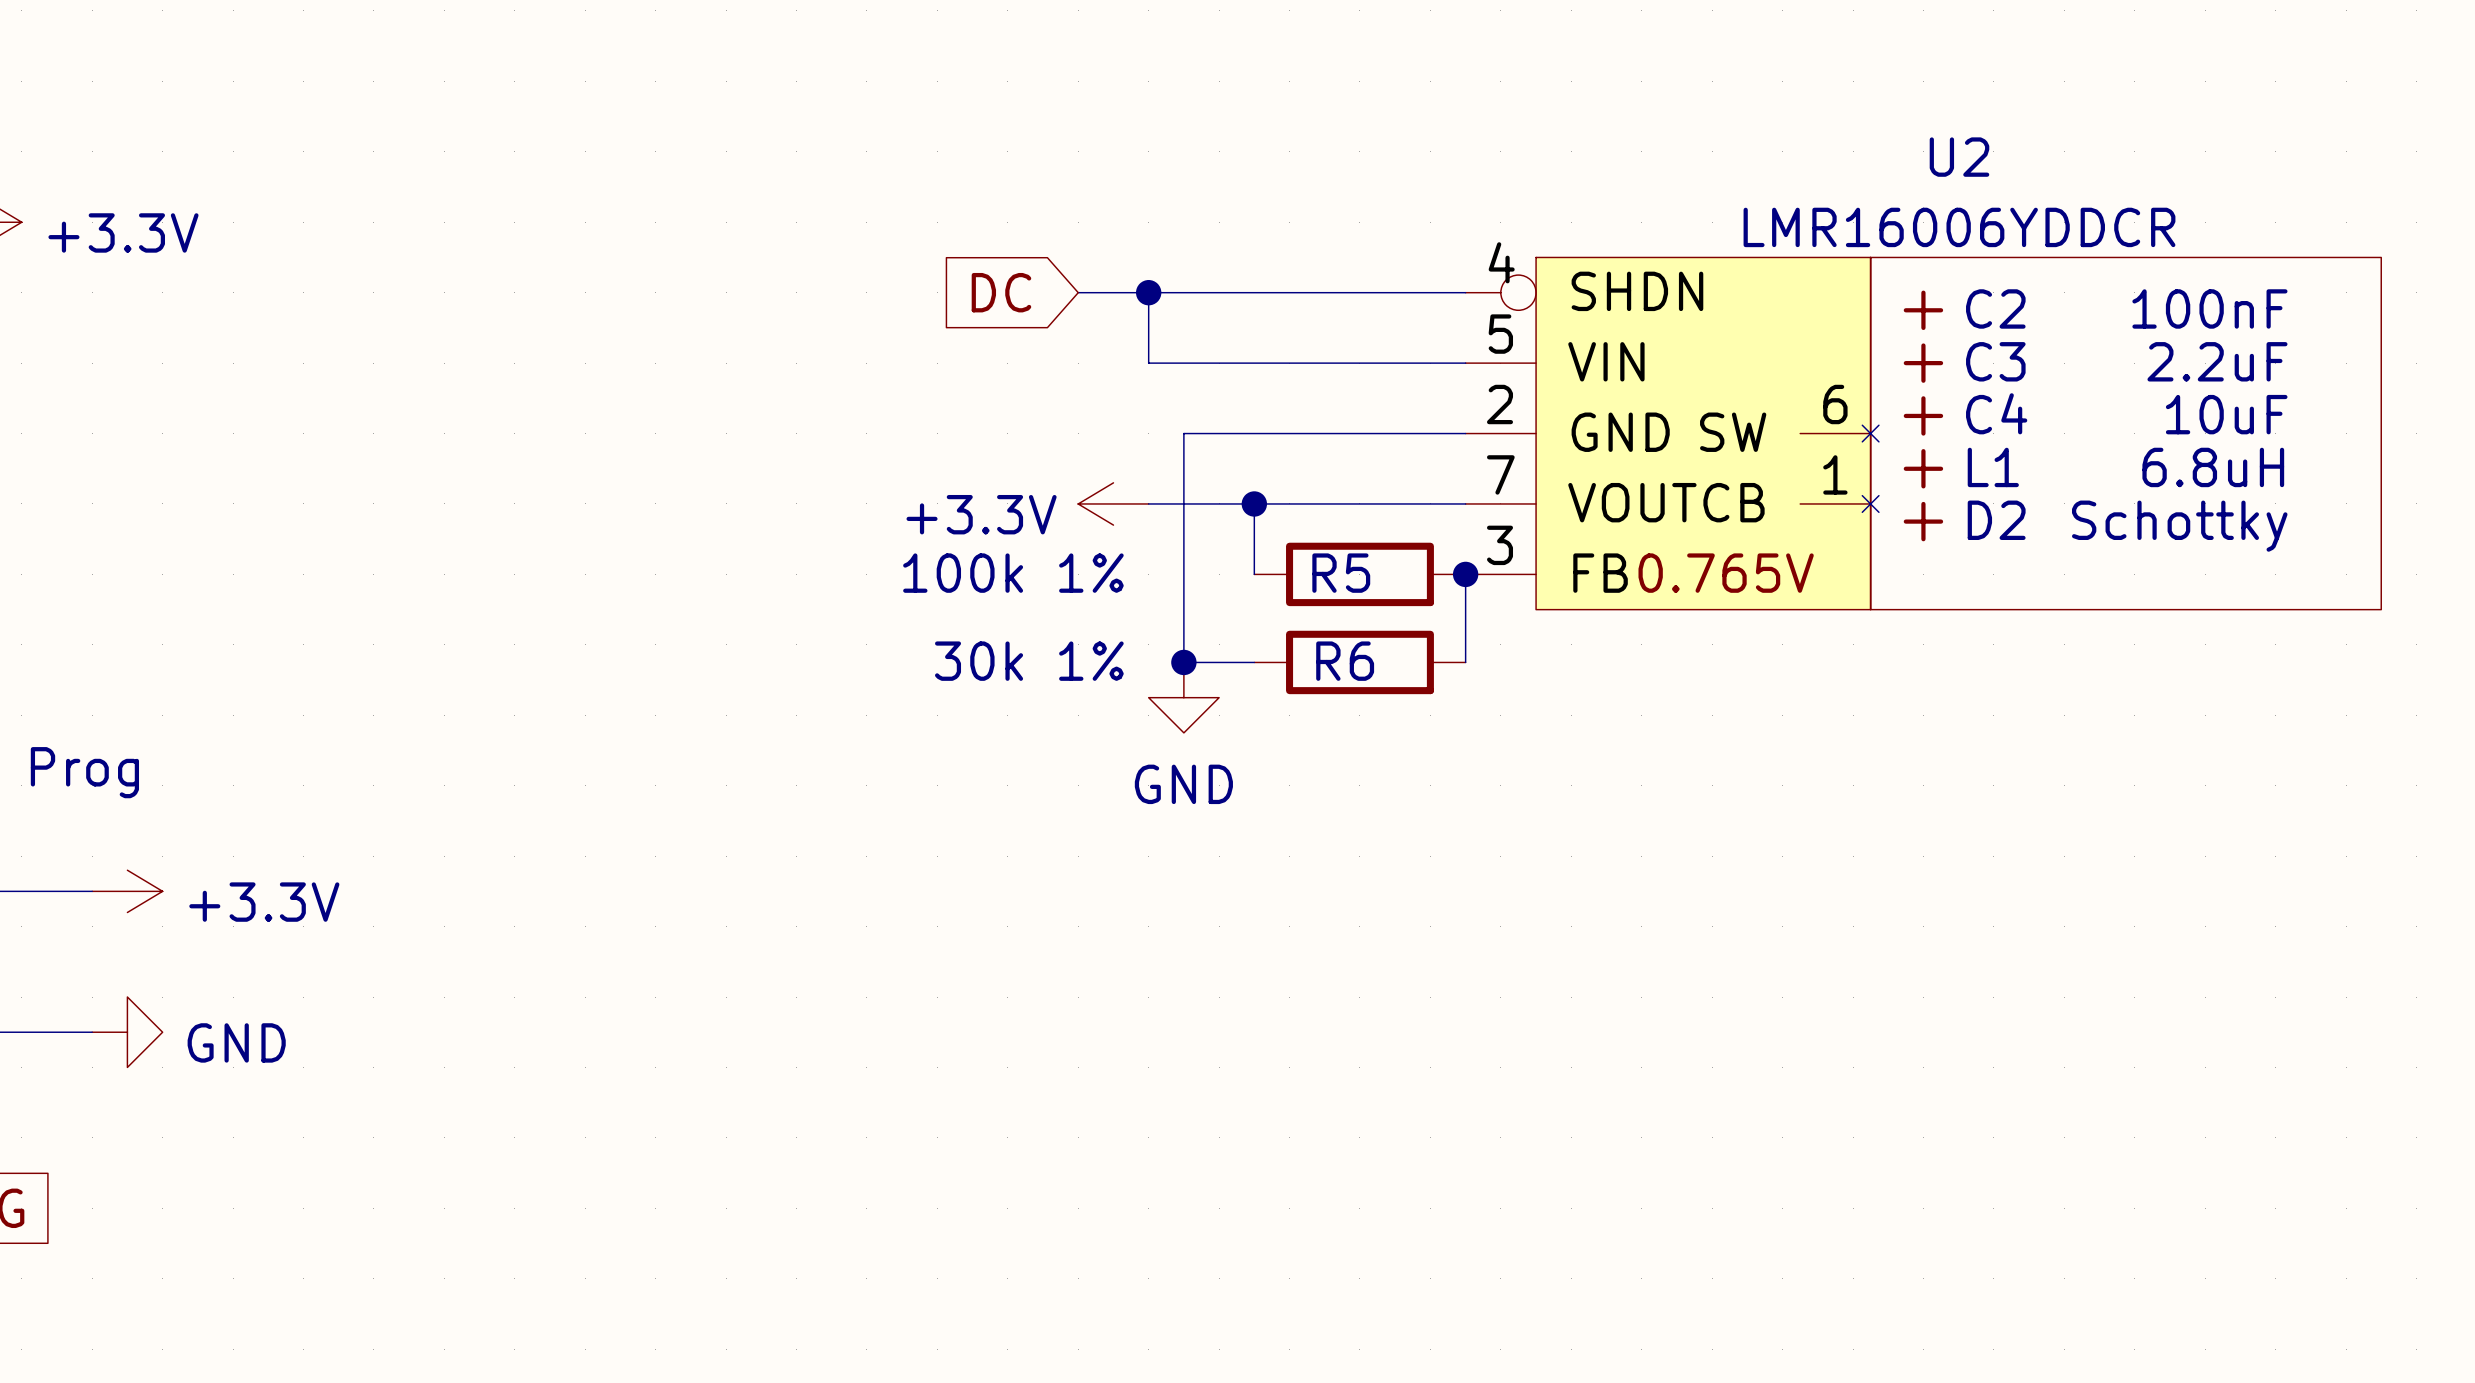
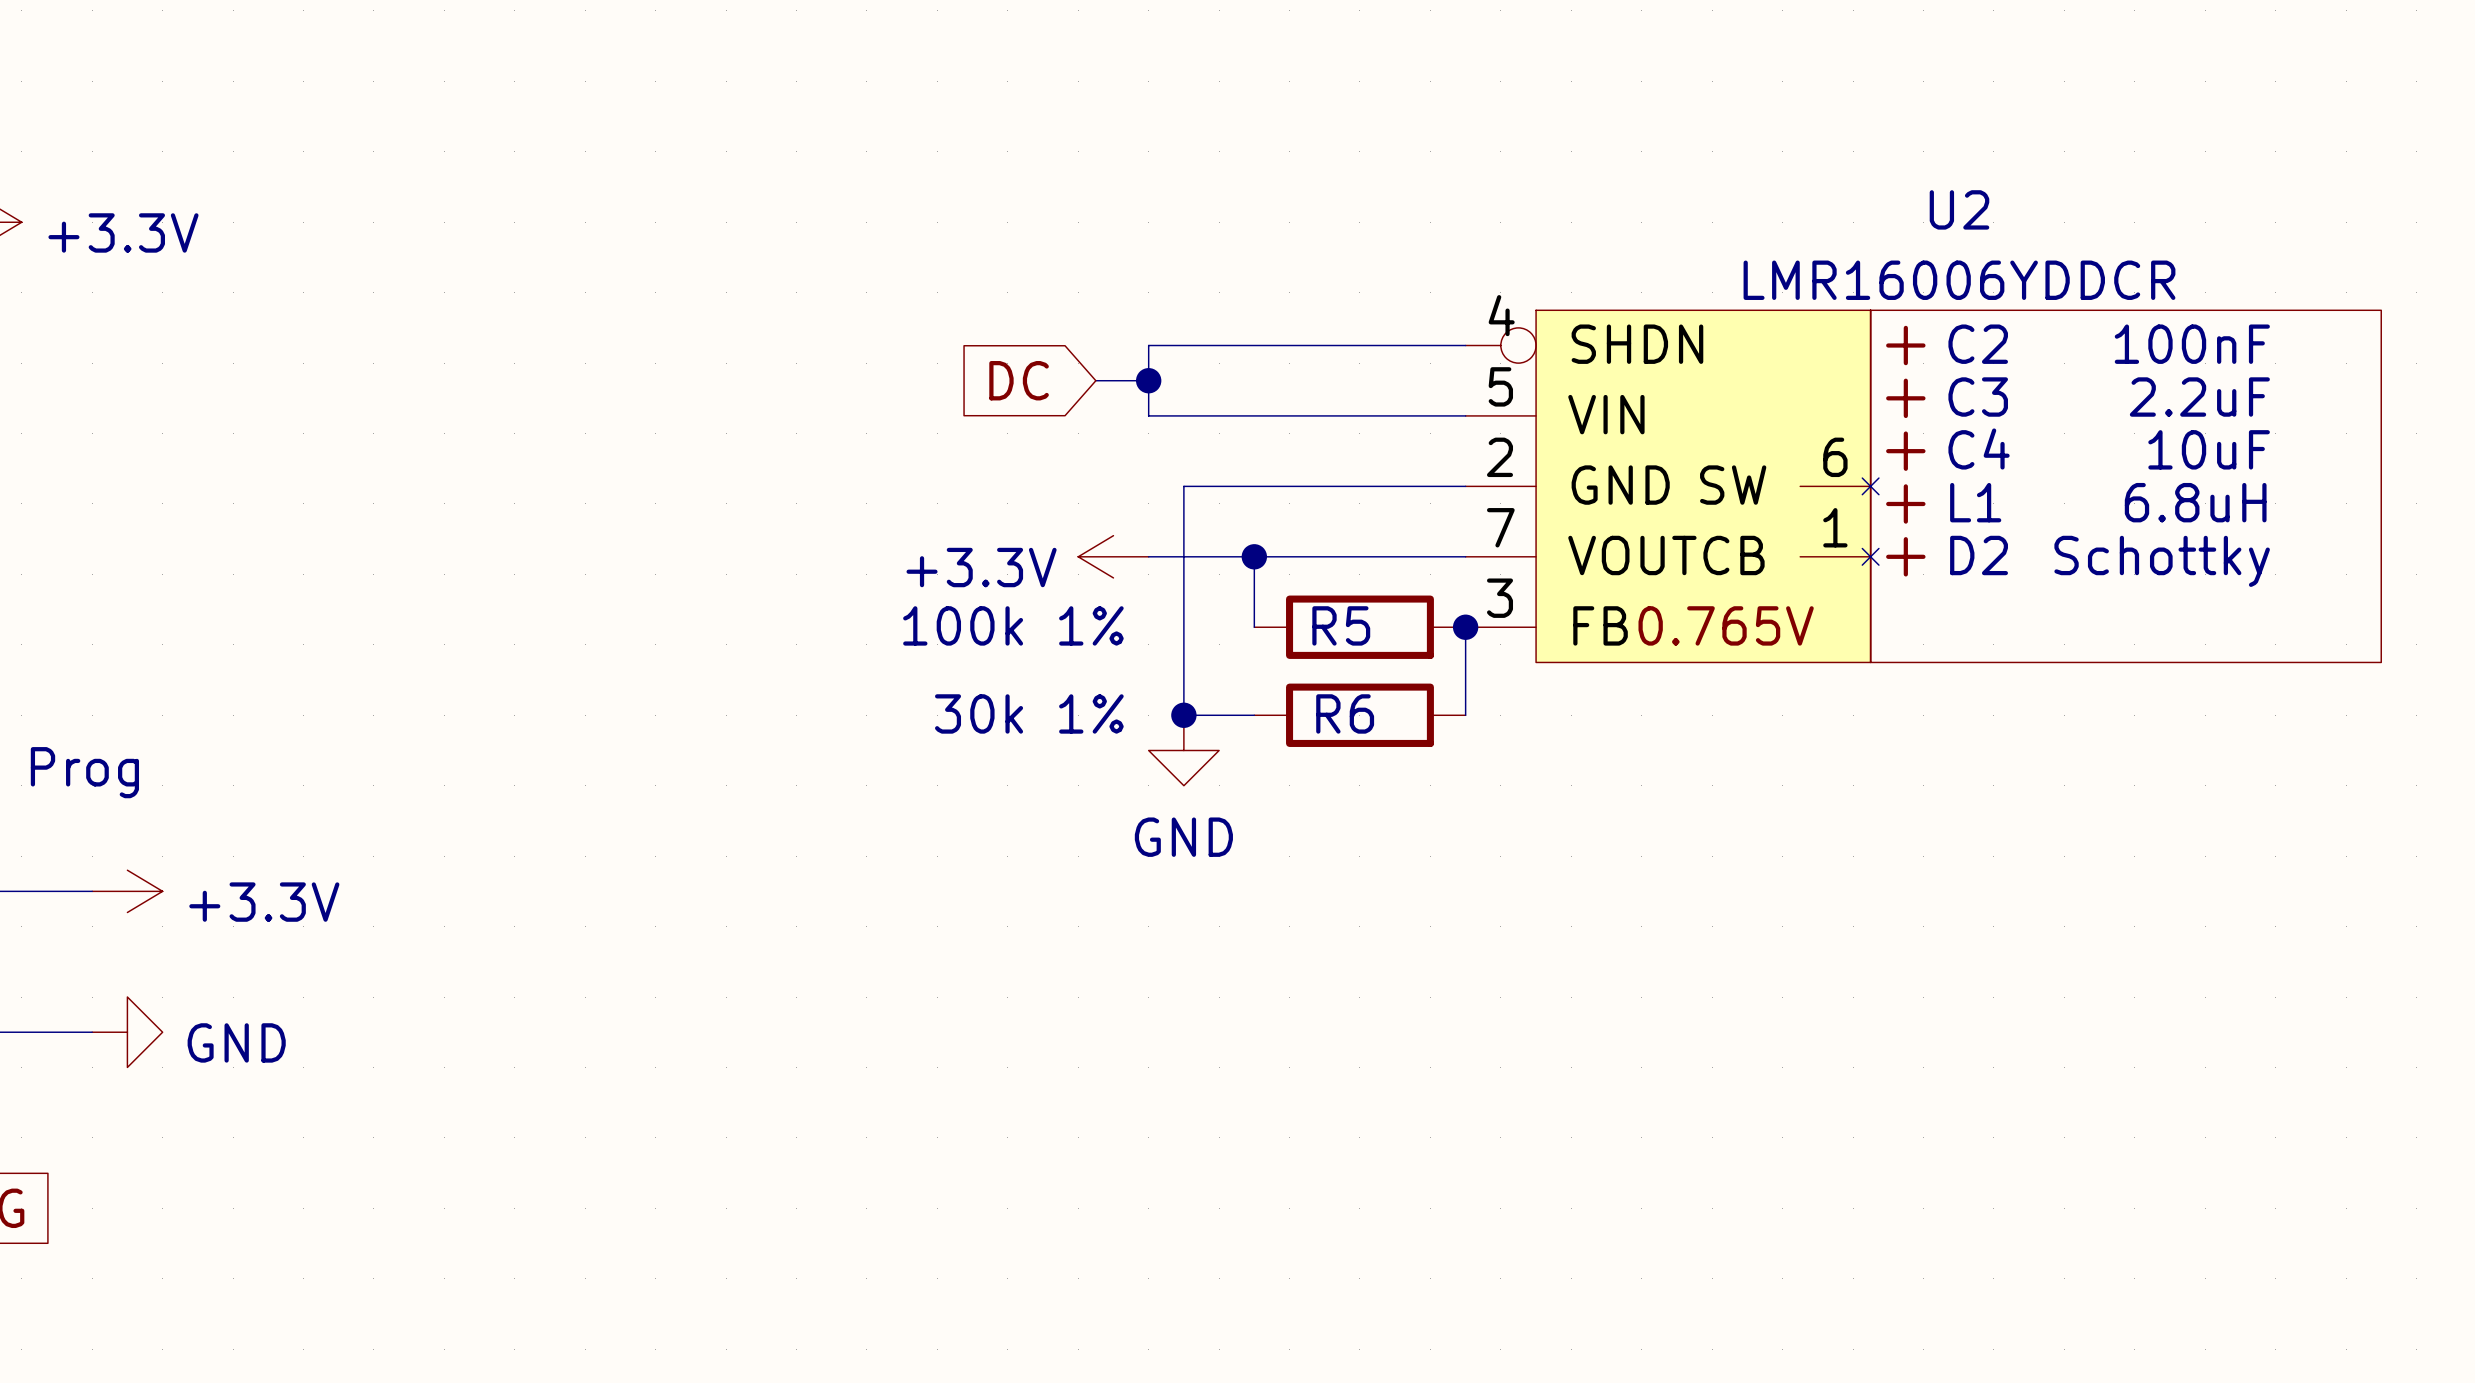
global label position: DC (1001, 292) -> DC (1019, 380)
wire: (1078, 292) (1465, 292) -> none
wire: (1148, 292) (1148, 345) -> (1465, 345) (1148, 345)
junction: (1148, 292) -> none
C2 position: (1923, 310) -> (1905, 345)
wire: (1148, 363) (1465, 363) -> (1148, 363) (1148, 415) (1465, 415)
C3 position: (1923, 363) -> (1905, 398)
wire: none -> (1095, 380) (1148, 380)
junction: none -> (1148, 380)
C4 position: (1923, 415) -> (1905, 451)
wire: (1465, 433) (1183, 433) (1183, 486) -> (1465, 486) (1183, 486)
U2 position: (1923, 433) -> (1923, 486)
L1 position: (1923, 468) -> (1905, 503)
power symbol position: +3.3V (1113, 503) -> +3.3V (1113, 556)
wire: (1148, 503) (1465, 503) -> (1148, 556) (1465, 556)
wire: (1254, 503) (1254, 556) -> (1254, 574) (1254, 627)
junction position: (1254, 503) -> (1254, 556)
D2 position: (1923, 521) -> (1905, 556)
R5 position: (1359, 574) -> (1359, 627)
wire: (1465, 574) (1465, 627) -> (1465, 662) (1465, 715)
junction position: (1465, 574) -> (1465, 627)
wire: (1183, 662) (1254, 662) -> (1183, 662) (1183, 715) (1254, 715)
junction position: (1183, 662) -> (1183, 715)
R6 position: (1359, 662) -> (1359, 715)
power symbol position: GND (1183, 697) -> GND (1183, 750)

